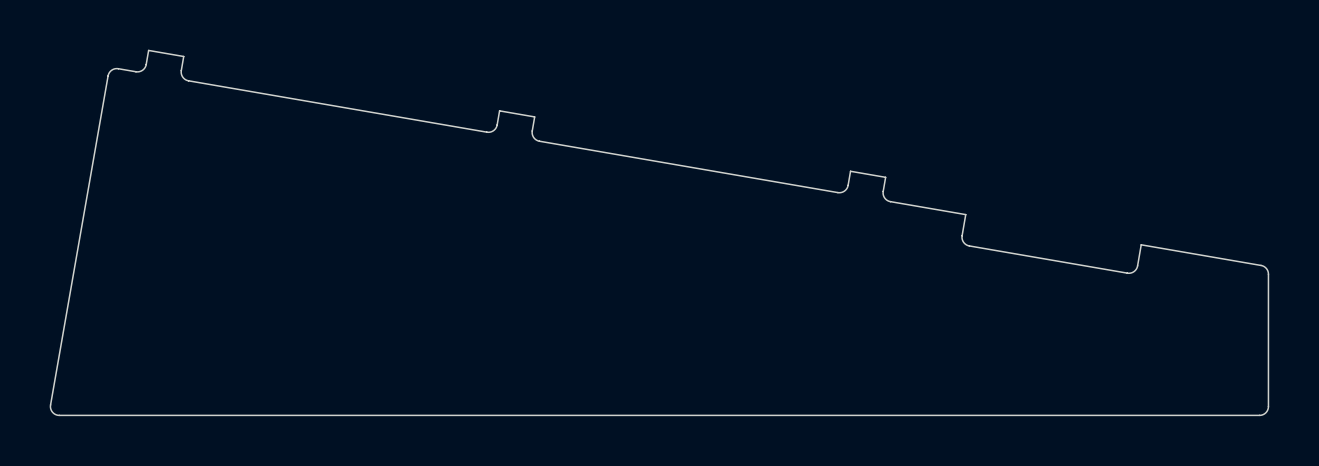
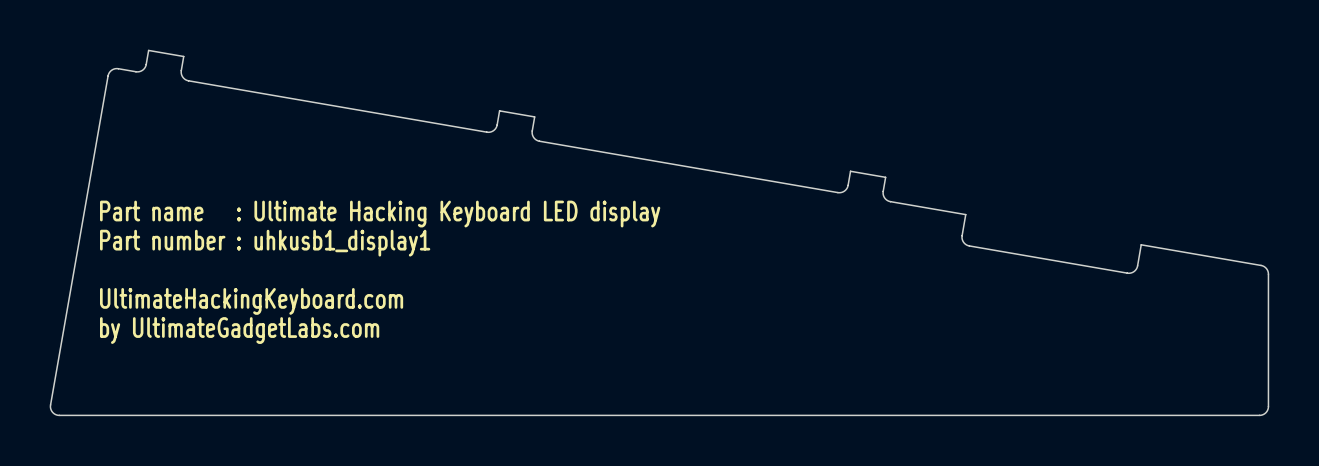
text: none -> Part name : Ultimate Hacking Keyboard LED display (380, 214)
text: none -> Part number : uhkusb1_display1 (265, 243)
text: none -> UltimateHackingKeyboard.com (251, 301)
text: none -> by UltimateGadgetLabs.com (239, 330)

